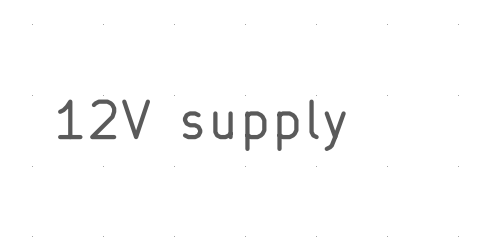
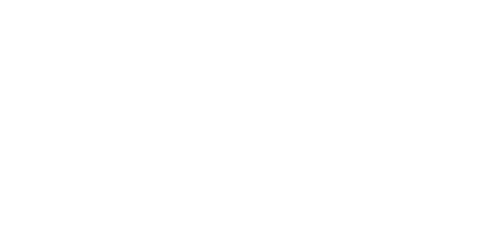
text: 12V supply (201, 125) -> none

